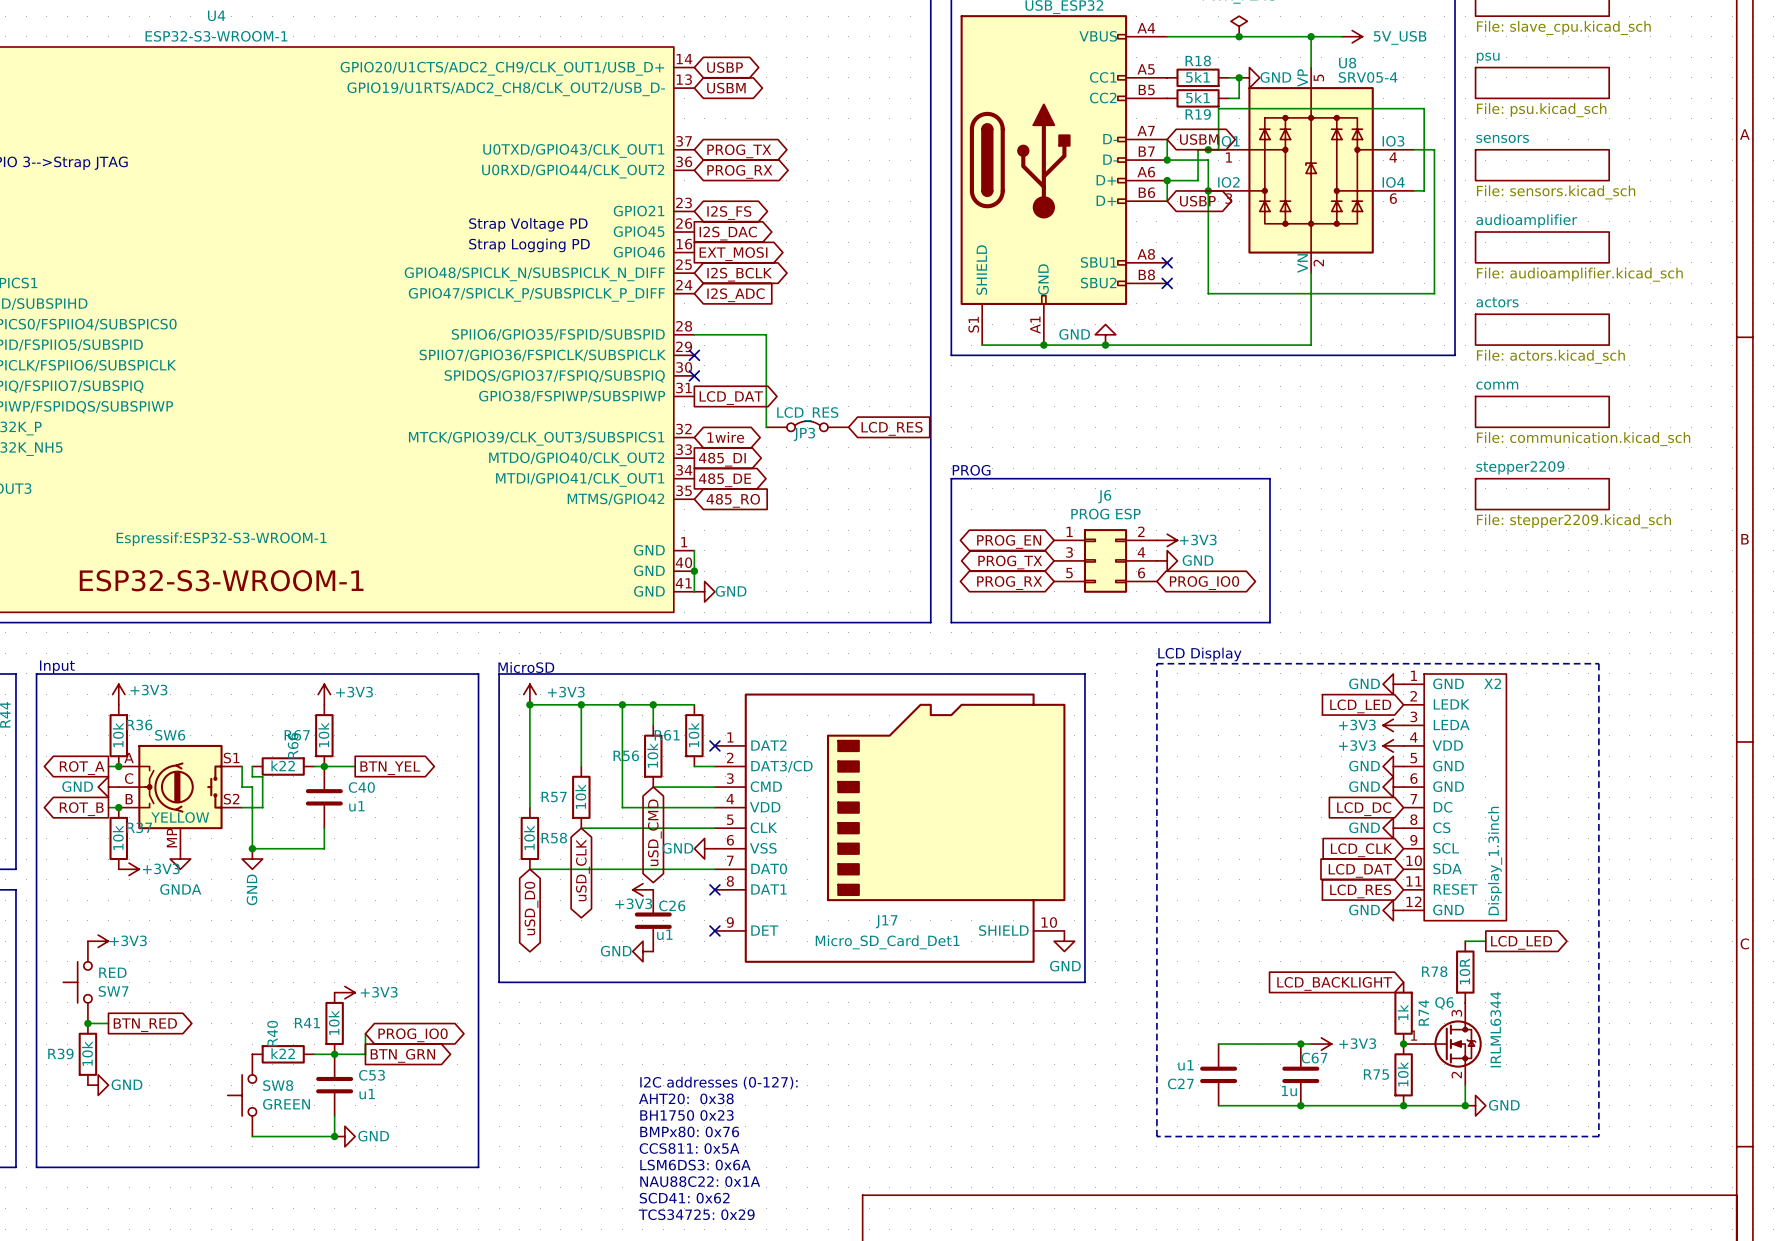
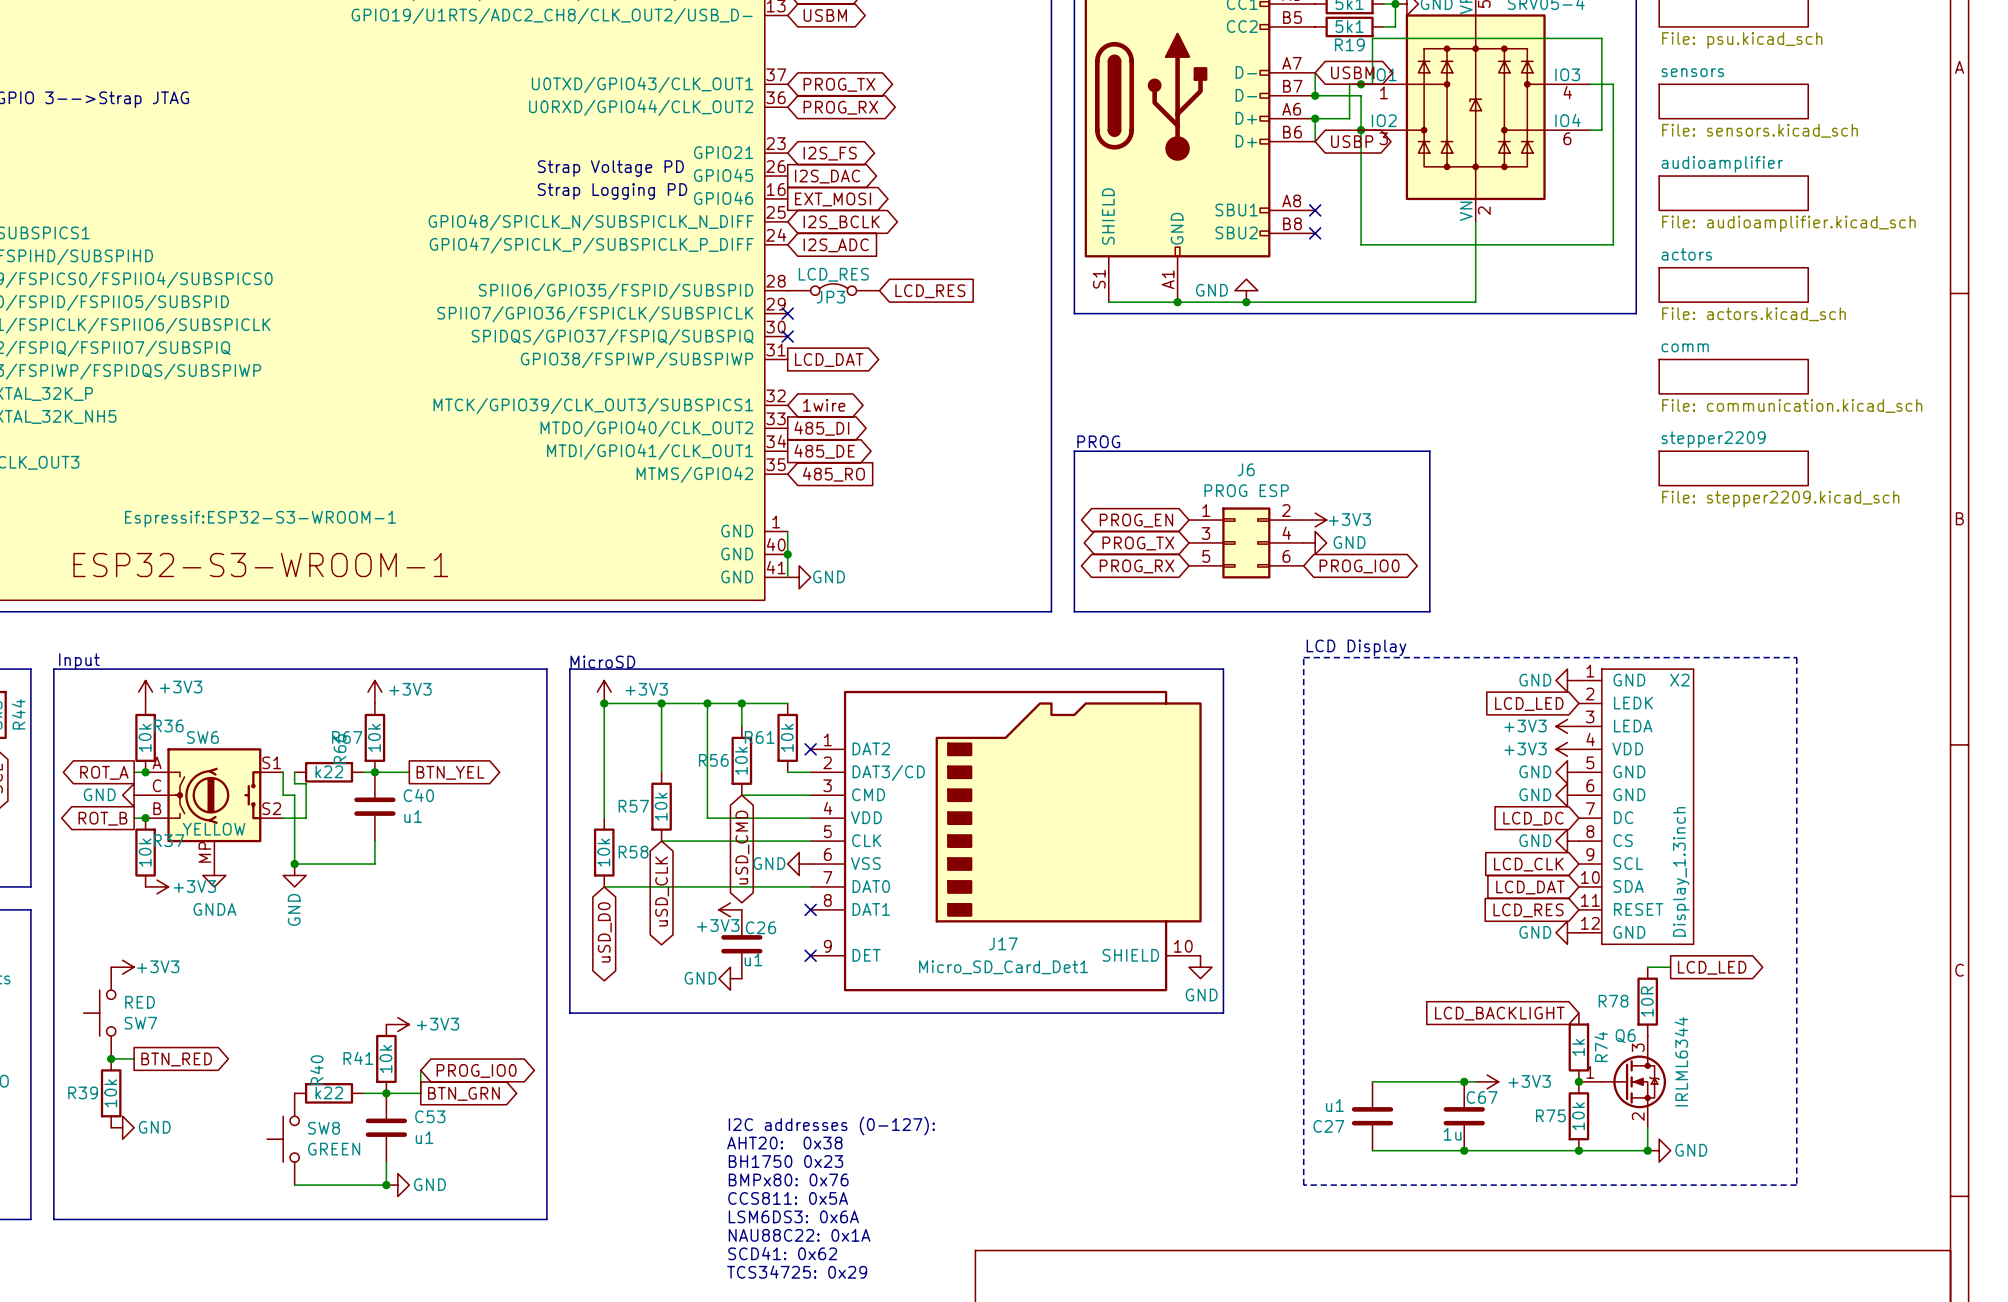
wire: (694, 334) (766, 334) (766, 427) -> none
JP3 position: (807, 426) -> (833, 289)
global label position: LCD_RES (892, 428) -> LCD_RES (930, 291)

